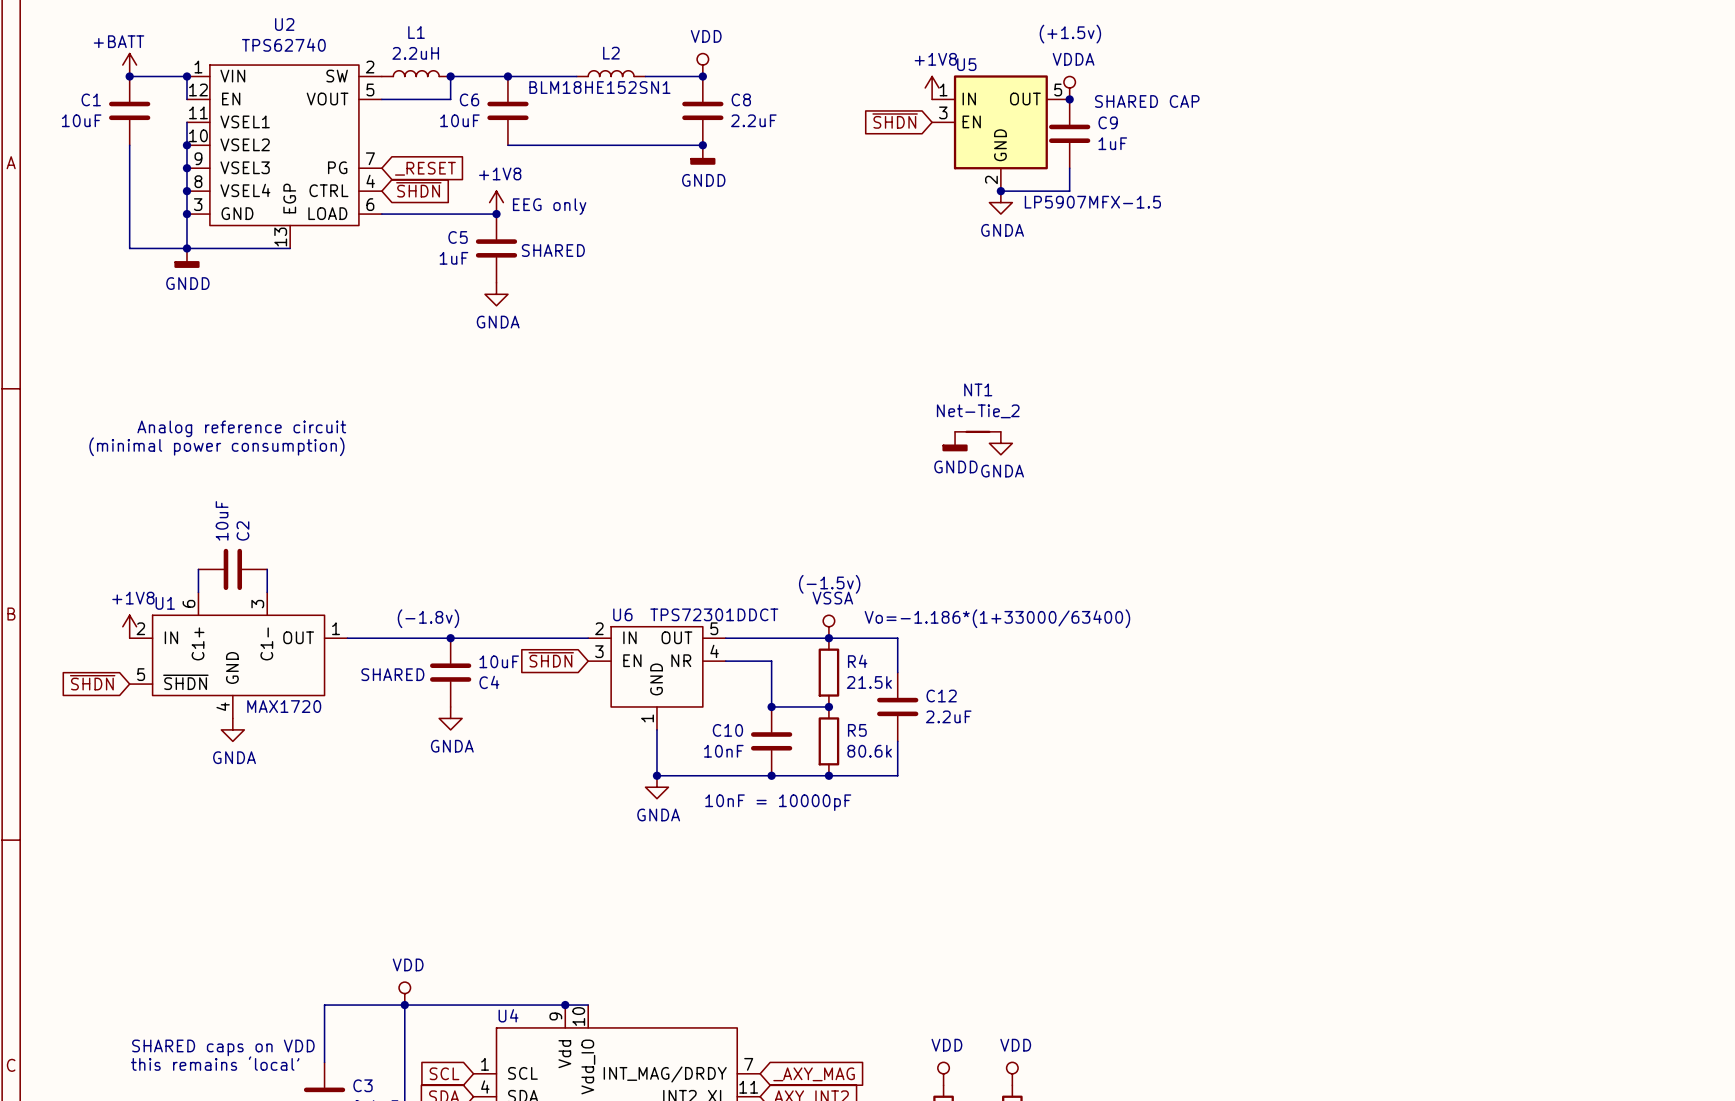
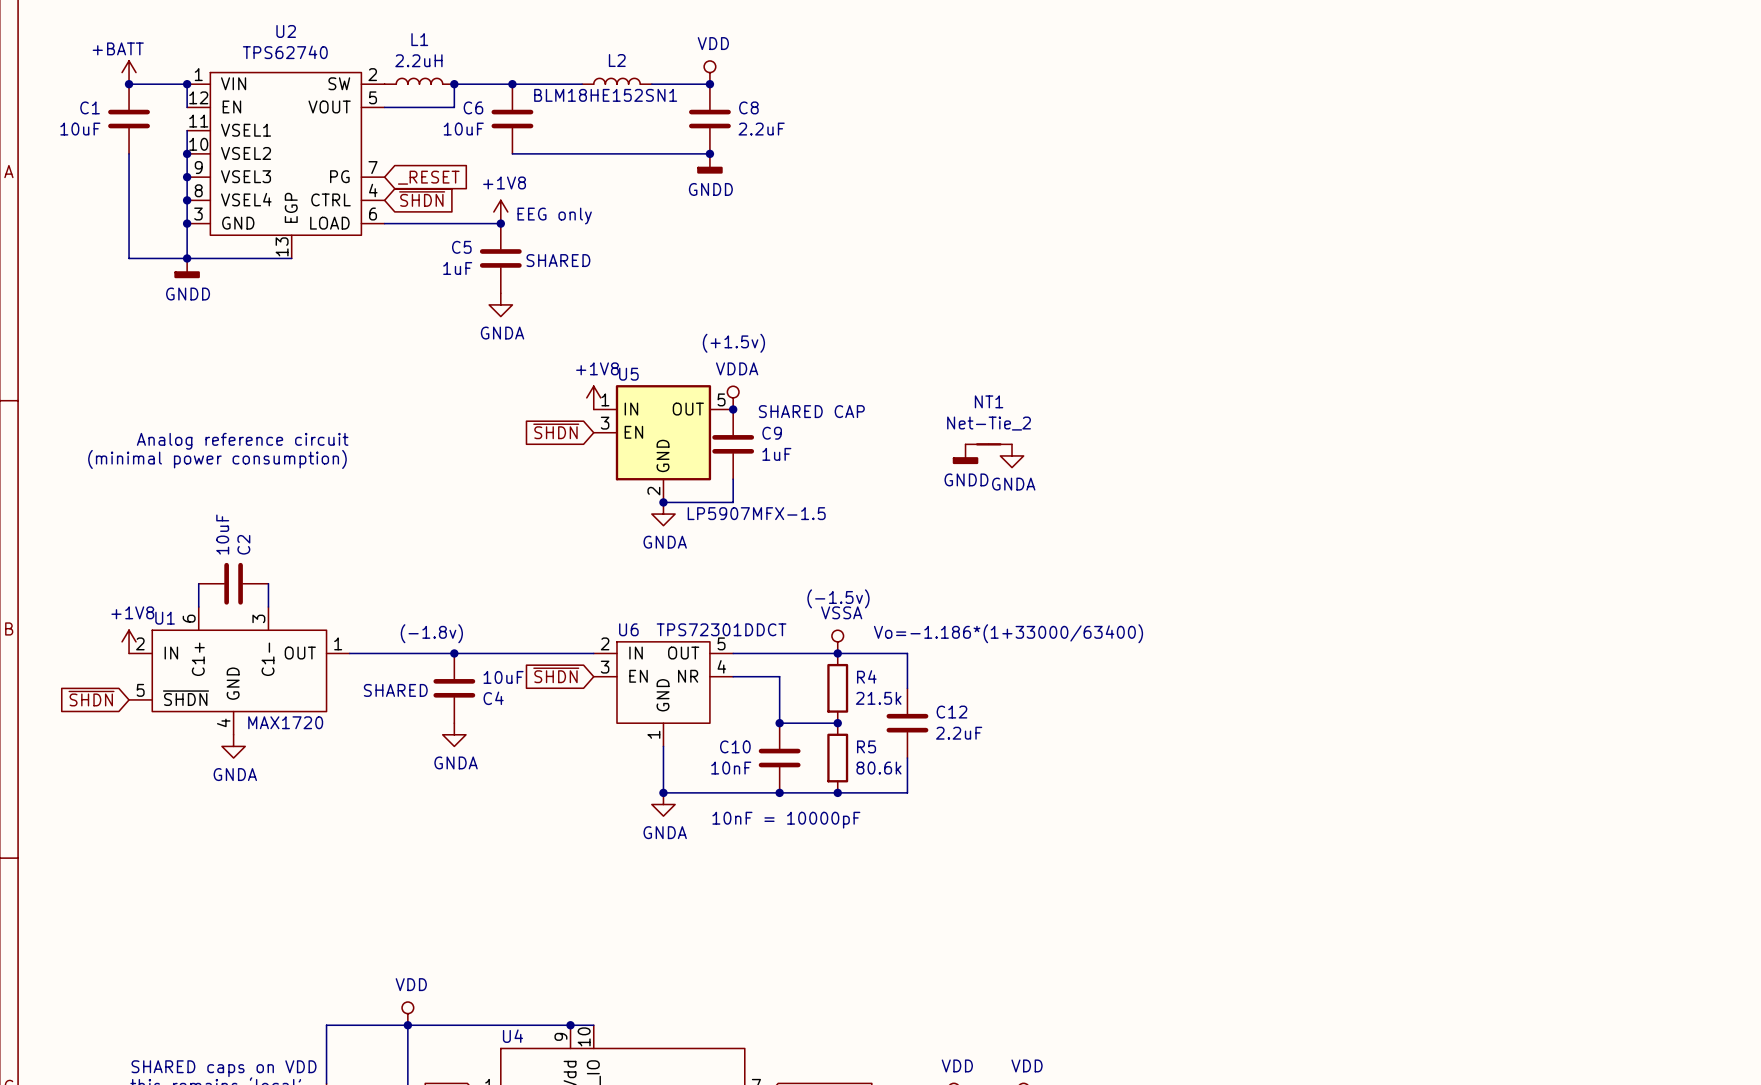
text: (+1.5v) (1070, 34) -> none
power symbol: +1V8 (932, 87) -> none
power symbol: VDDA (1069, 87) -> none
junction: (1069, 99) -> none
text: SHARED CAP (1147, 101) -> none
global label: ~{SHDN} (895, 121) -> none
U5 position: (1000, 133) -> (663, 443)
C9 position: (1069, 133) -> (733, 444)
wire: (1069, 168) (1069, 191) (1000, 191) -> none
junction: (1000, 191) -> none
power symbol: GNDA (1000, 202) -> none
text: none -> (+1.5v) (733, 343)
power symbol: none -> +1V8 (593, 397)
power symbol: none -> VDDA (733, 397)
junction: none -> (733, 409)
text: none -> SHARED CAP (811, 411)
global label: none -> ~{SHDN} (556, 431)
wire: none -> (733, 479) (733, 502) (663, 502)
junction: none -> (663, 502)
power symbol: none -> GNDA (663, 514)

